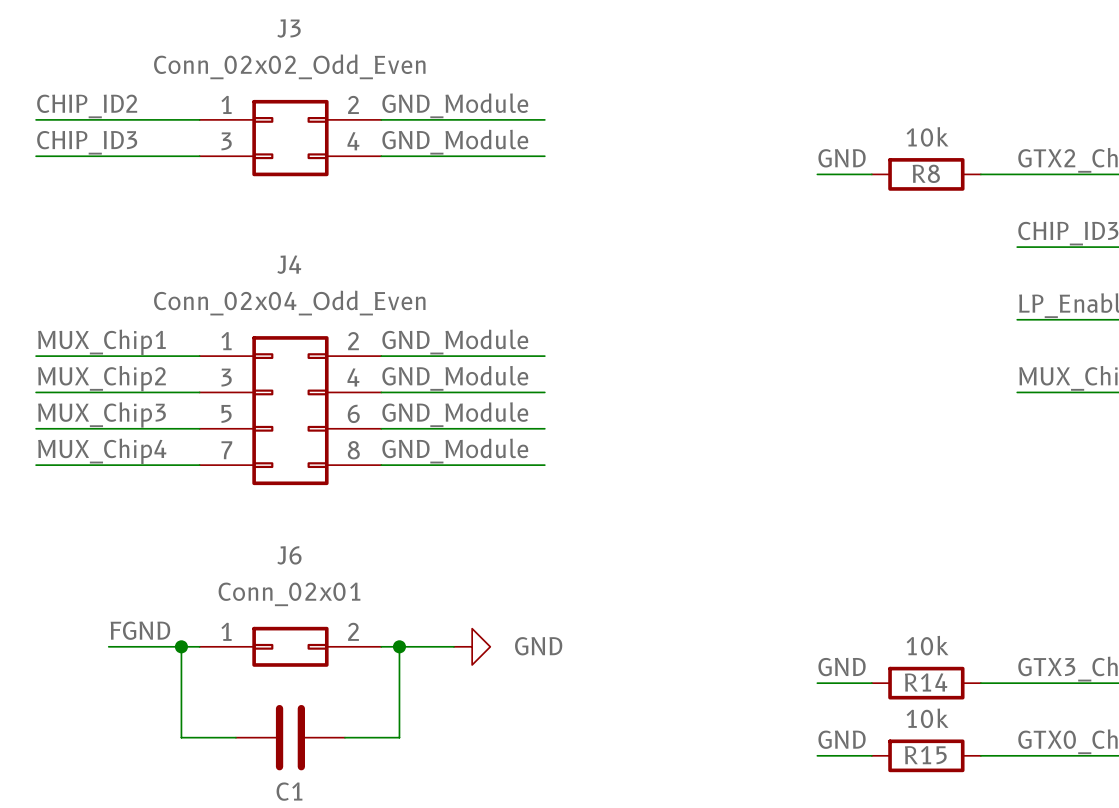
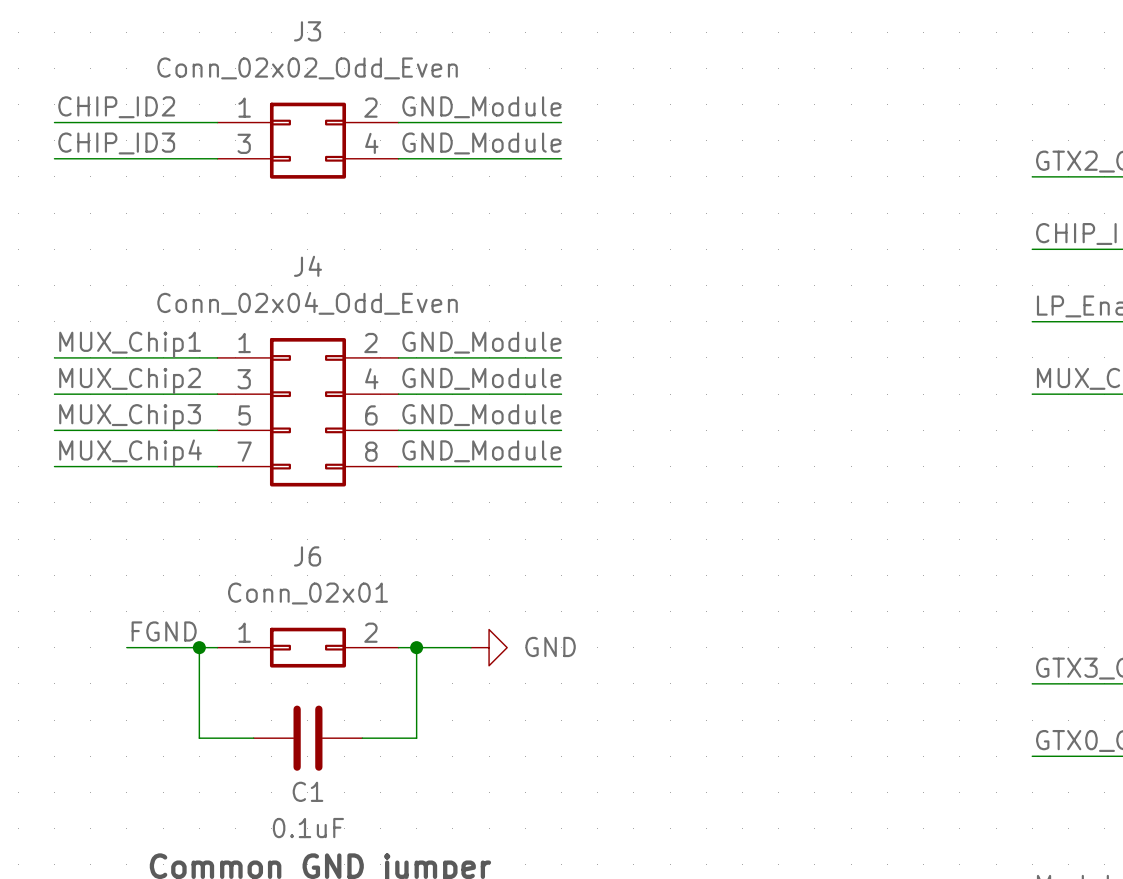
label: GND (842, 158) -> none
wire: (817, 174) (871, 174) -> none
R8: 10k (926, 174) -> none
wire: (980, 174) (1017, 174) -> none
label: GND (842, 667) -> none
wire: (817, 683) (871, 683) -> none
R14: 10k (926, 683) -> none
wire: (980, 683) (1017, 683) -> none
label: GND (842, 739) -> none
wire: (817, 755) (871, 755) -> none
R15: 10k (926, 755) -> none
wire: (980, 755) (1017, 755) -> none

